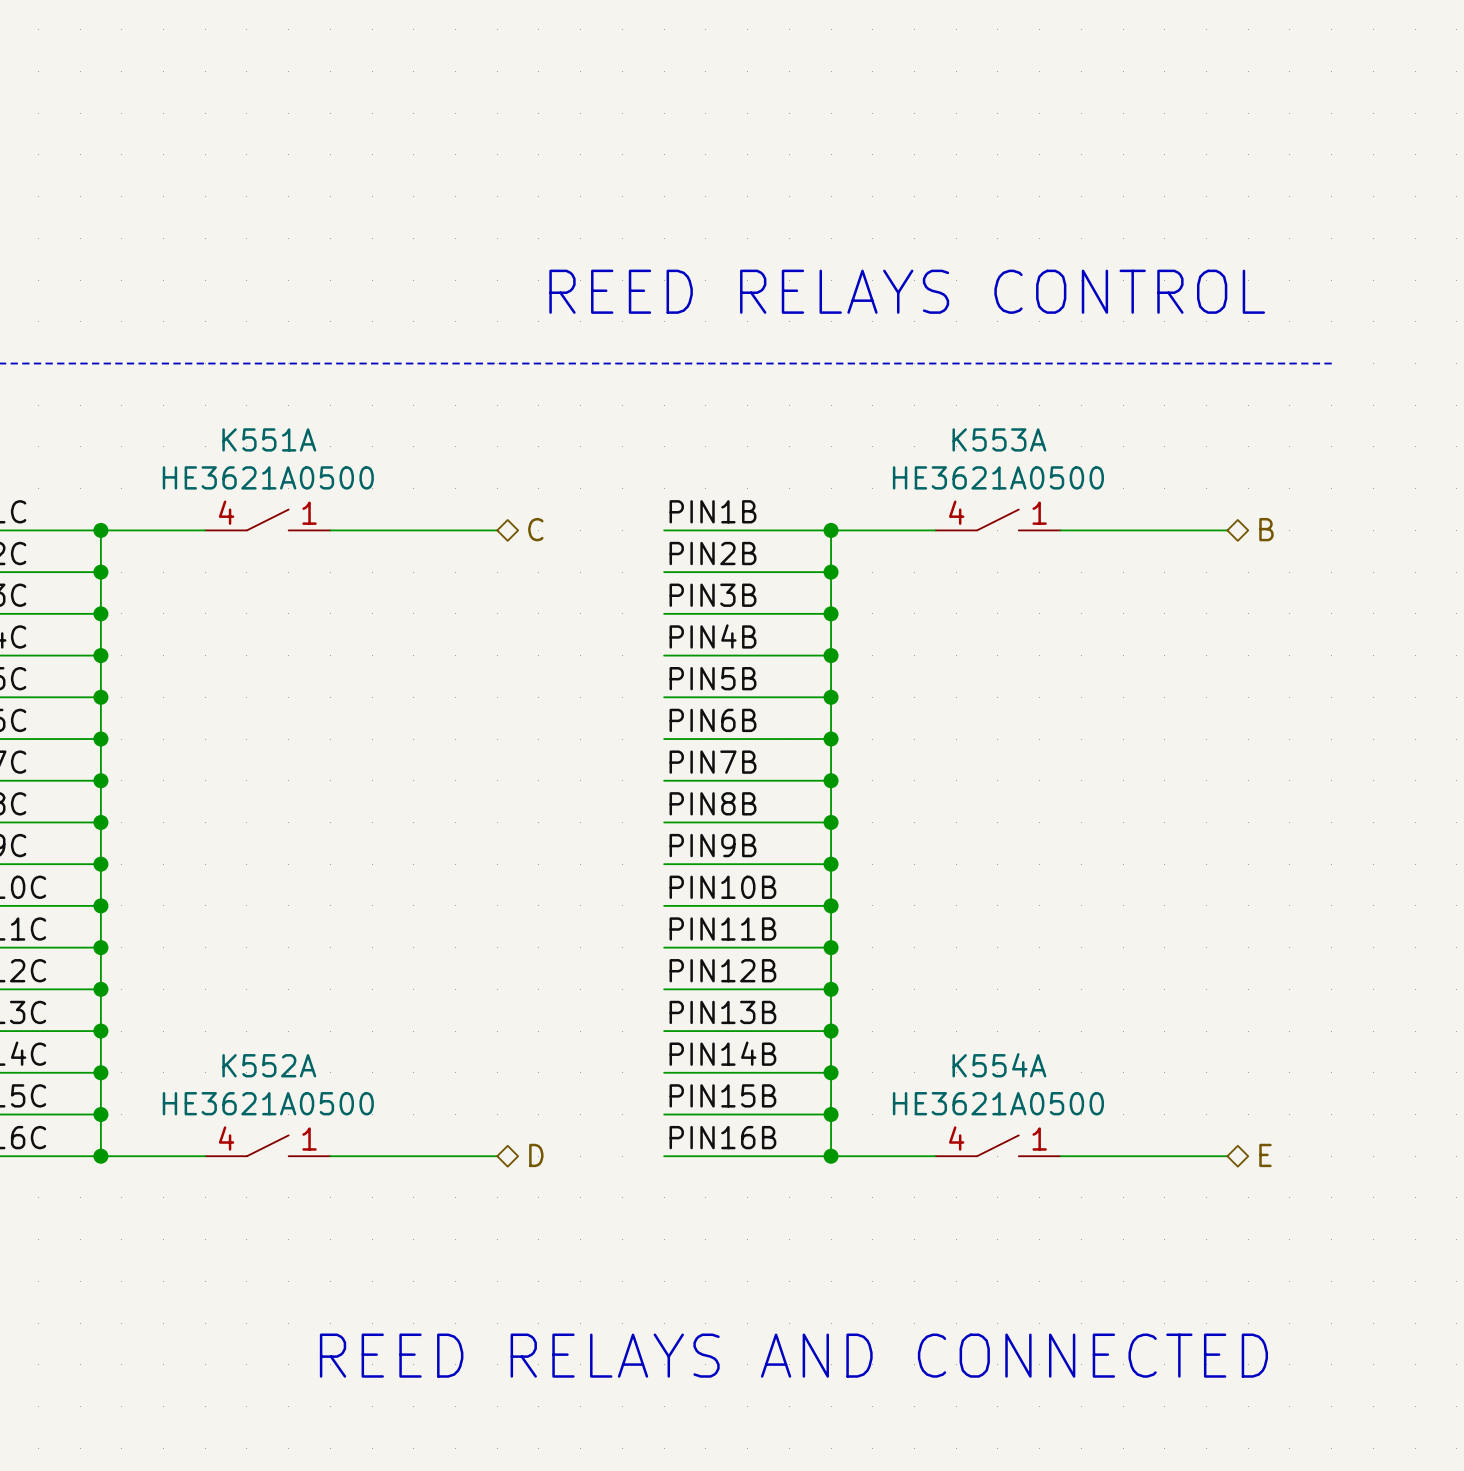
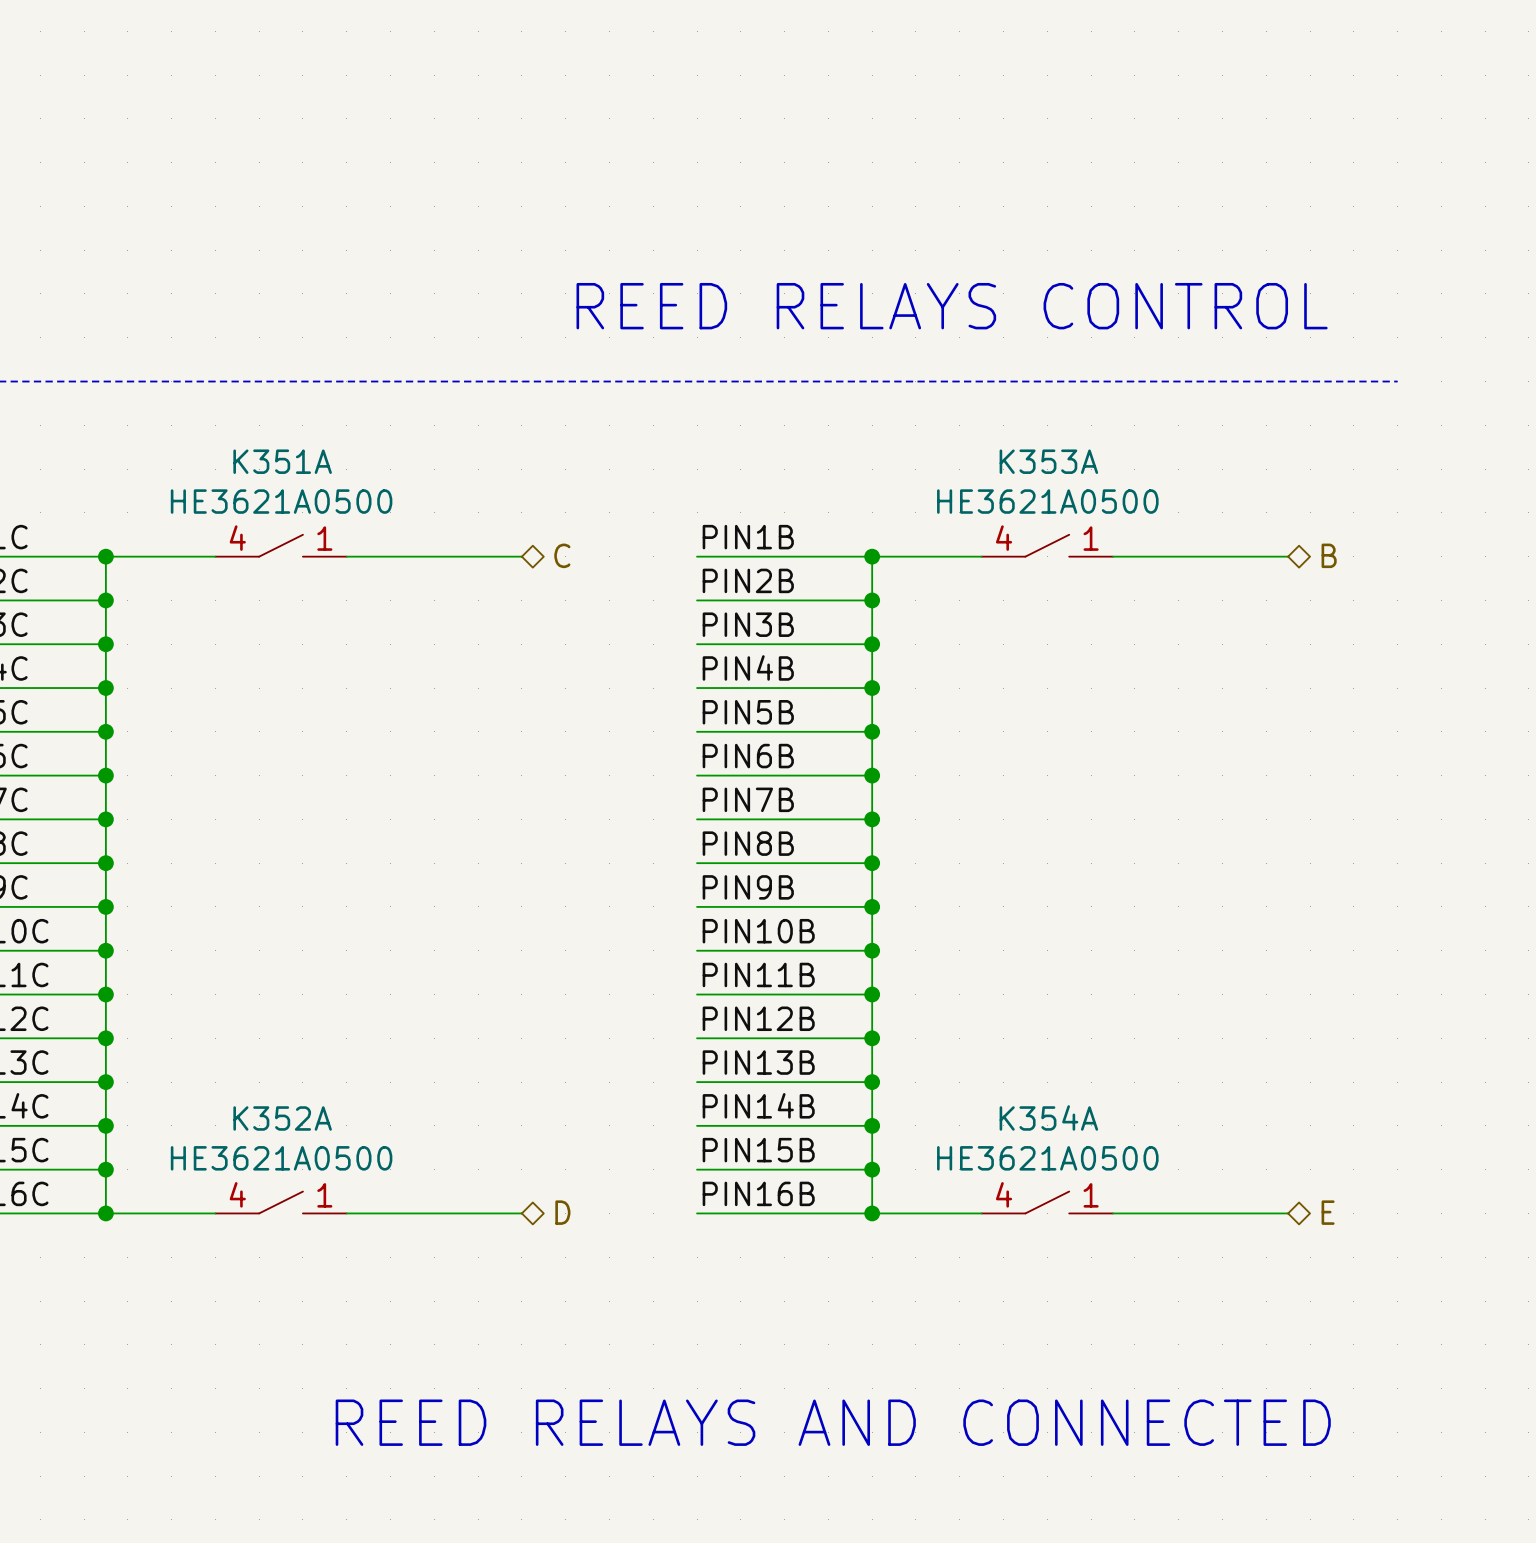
K551A name: K551A (269, 439) -> K351A (282, 461)
K553A name: K553A (999, 439) -> K353A (1048, 461)
K552A name: K552A (269, 1065) -> K352A (282, 1118)
K554A name: K554A (999, 1065) -> K354A (1048, 1117)

